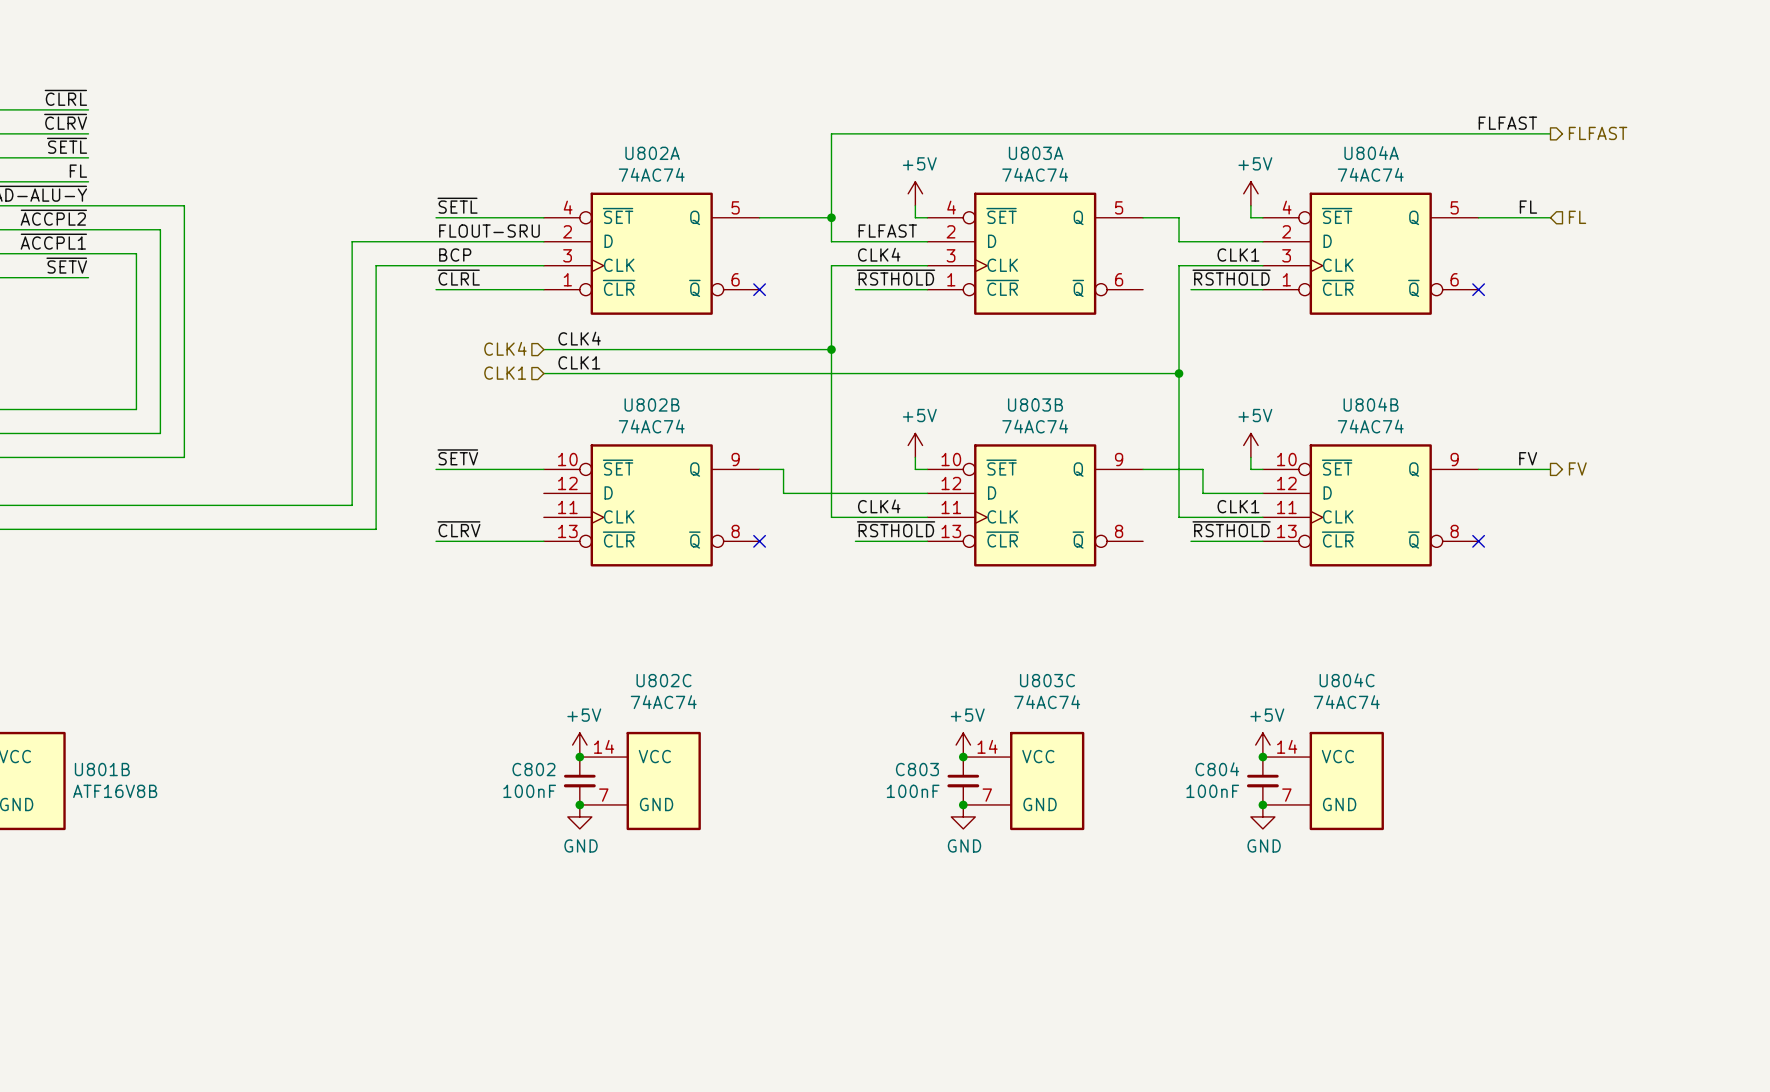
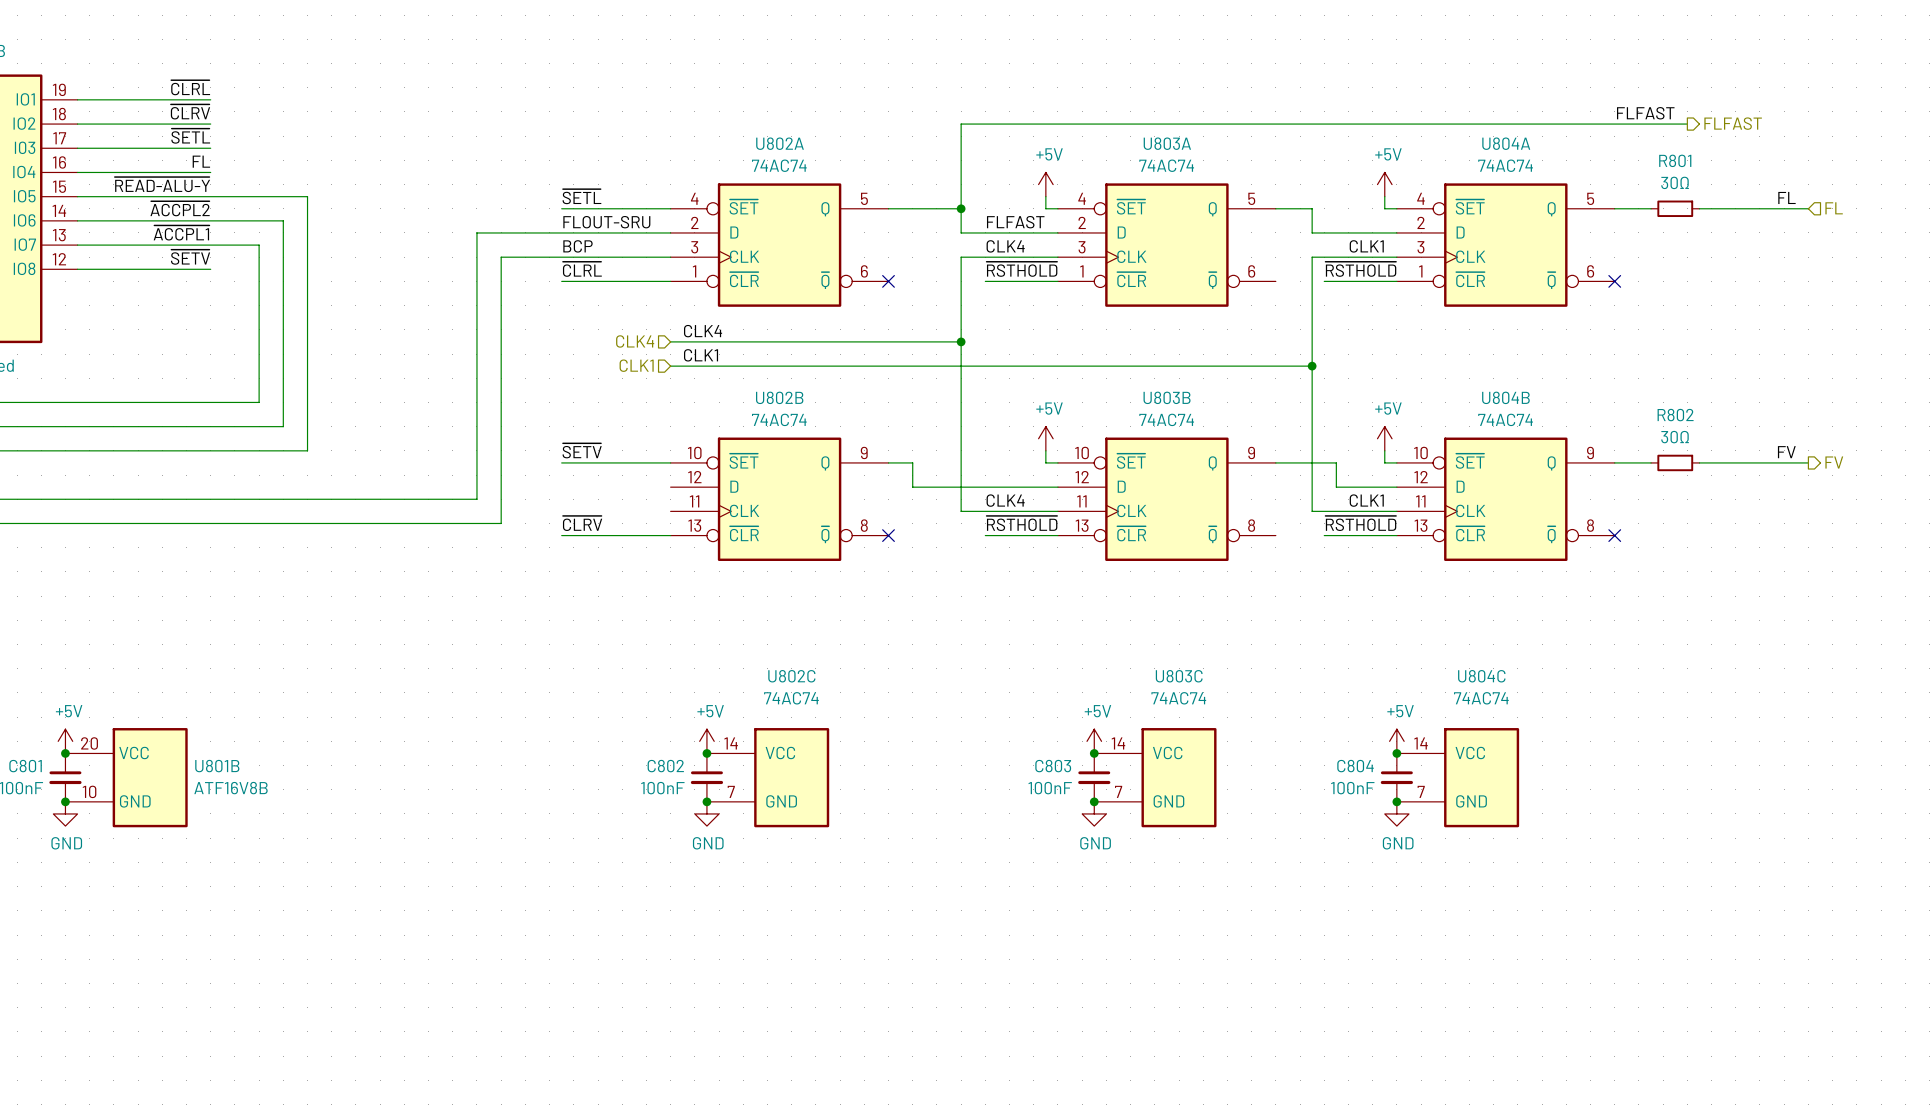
label position: FL (1528, 207) -> FL (1786, 197)
wire: (1514, 217) (1550, 217) -> none
R801: none -> 30Ω (1675, 208)
wire: none -> (1699, 208) (1808, 208)
hierarchical label position: FL (1577, 217) -> FL (1834, 208)
label position: FV (1528, 458) -> FV (1786, 452)
hierarchical label position: FV (1577, 468) -> FV (1834, 462)
wire: (1514, 469) (1550, 469) -> none
R802: none -> 30Ω (1675, 462)
wire: none -> (1699, 462) (1808, 462)

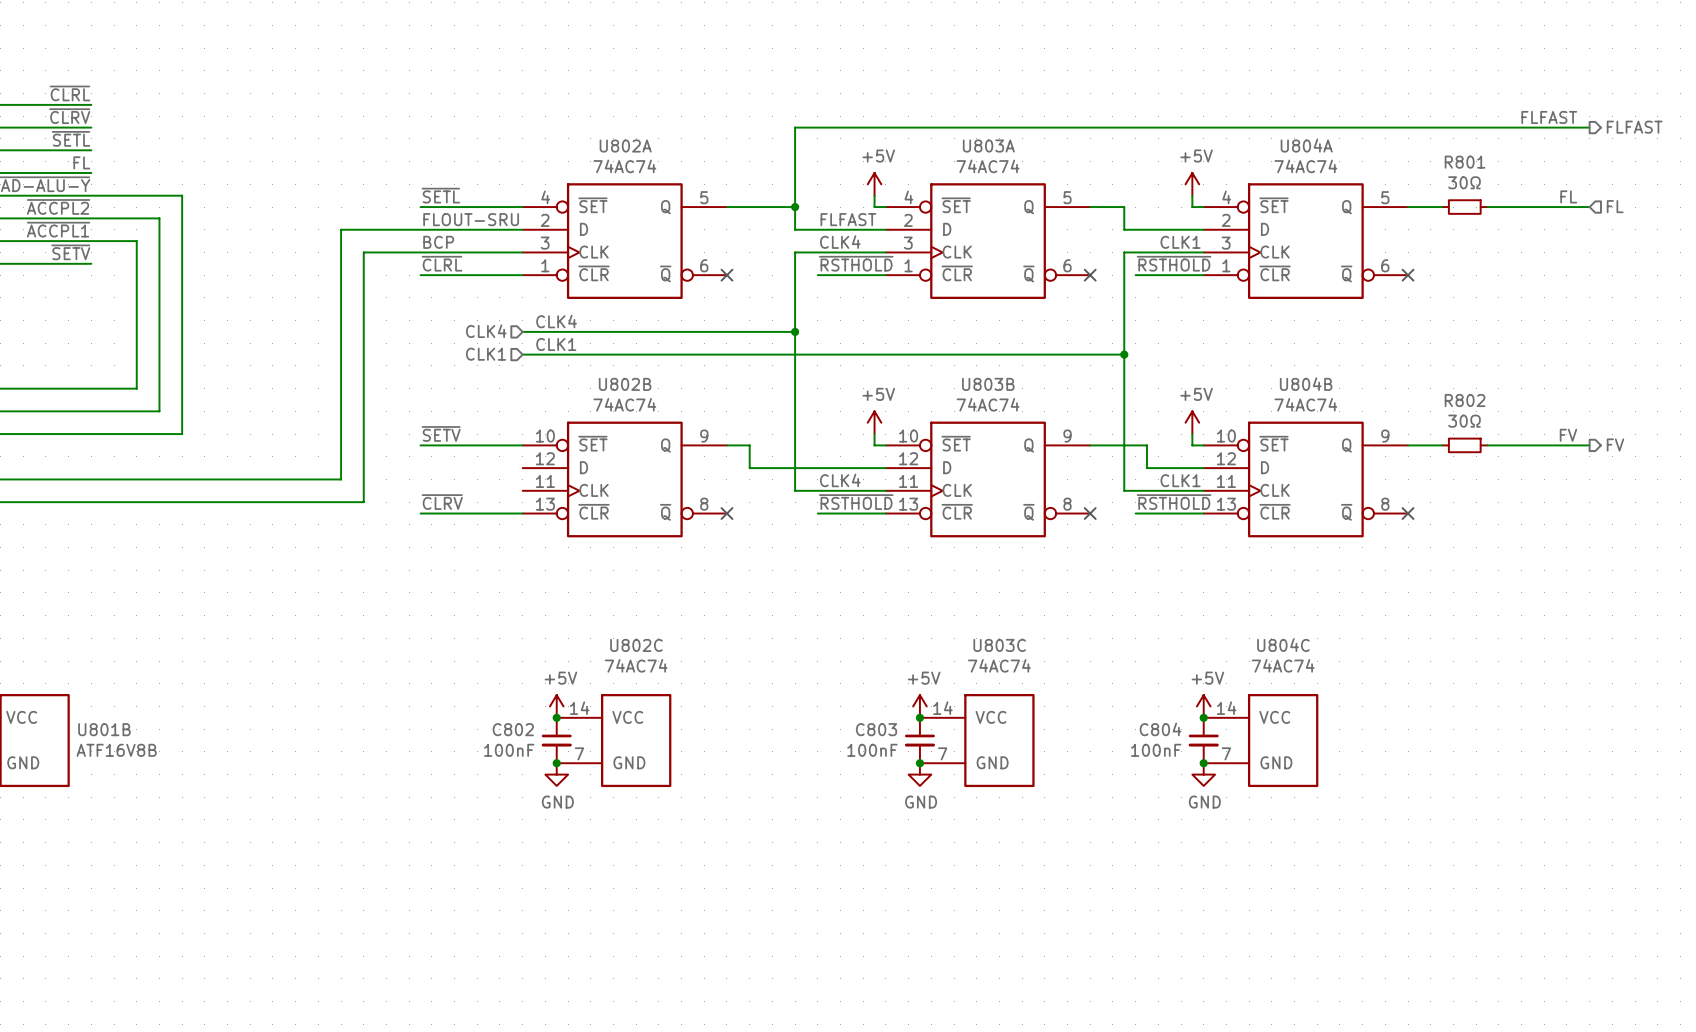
label position: FLFAST (1645, 113) -> FLFAST (1549, 117)
hierarchical label position: FLFAST (1733, 123) -> FLFAST (1634, 127)
wire: none -> (1476, 127) (1589, 127)
no-connect mark: none -> (1090, 275)
no-connect mark: none -> (1090, 513)

